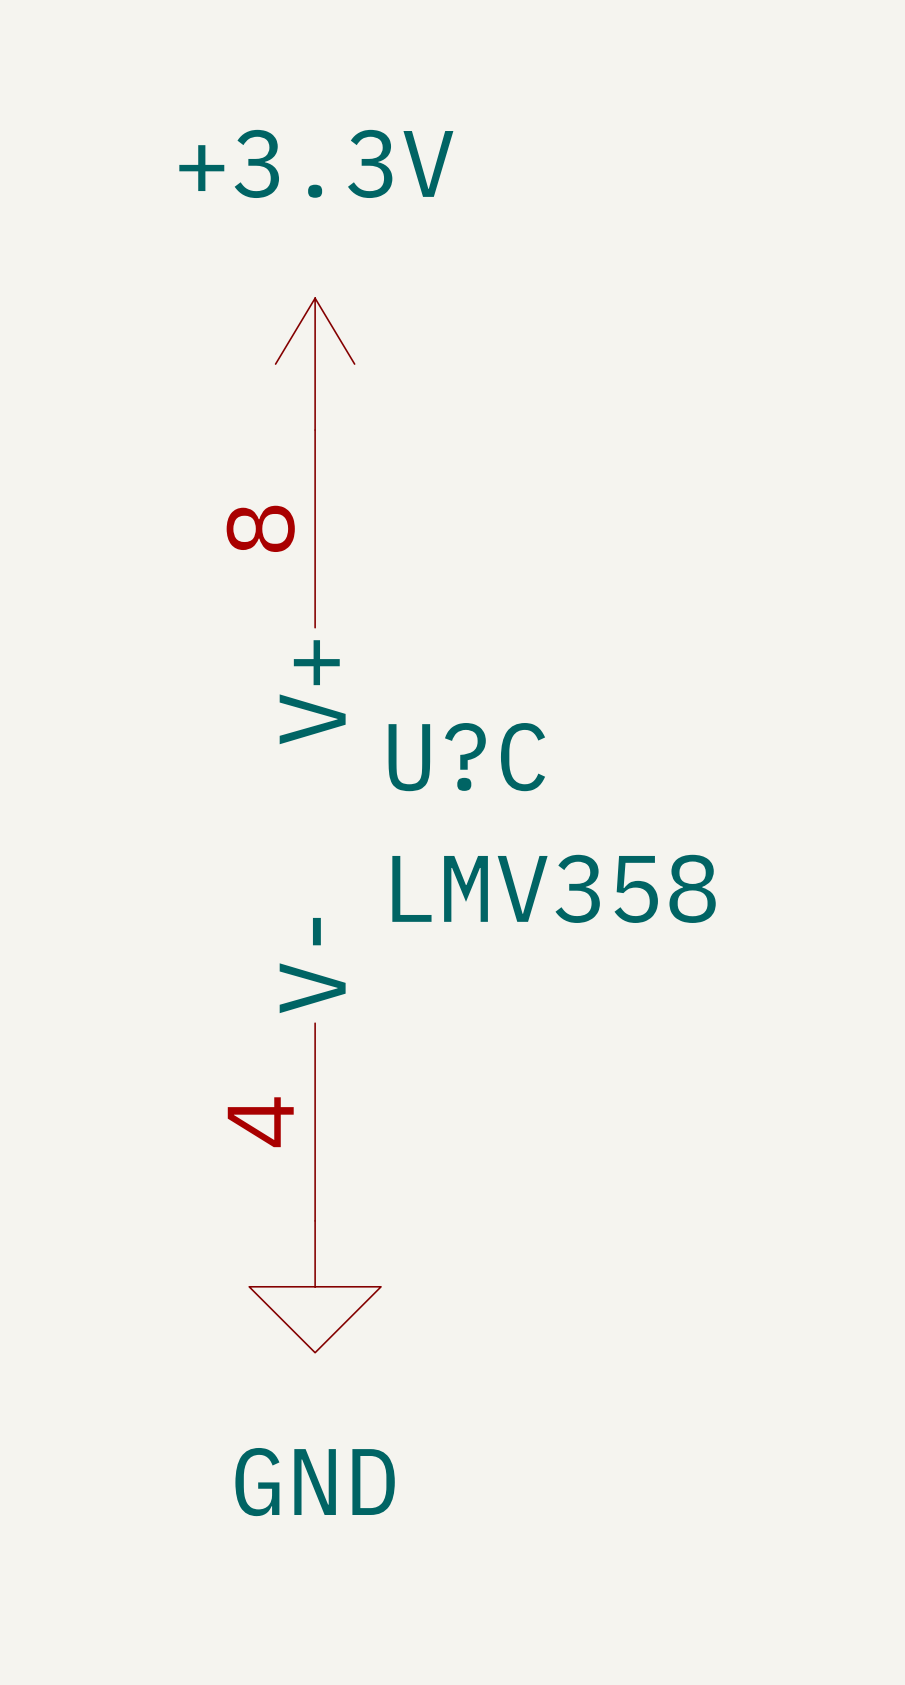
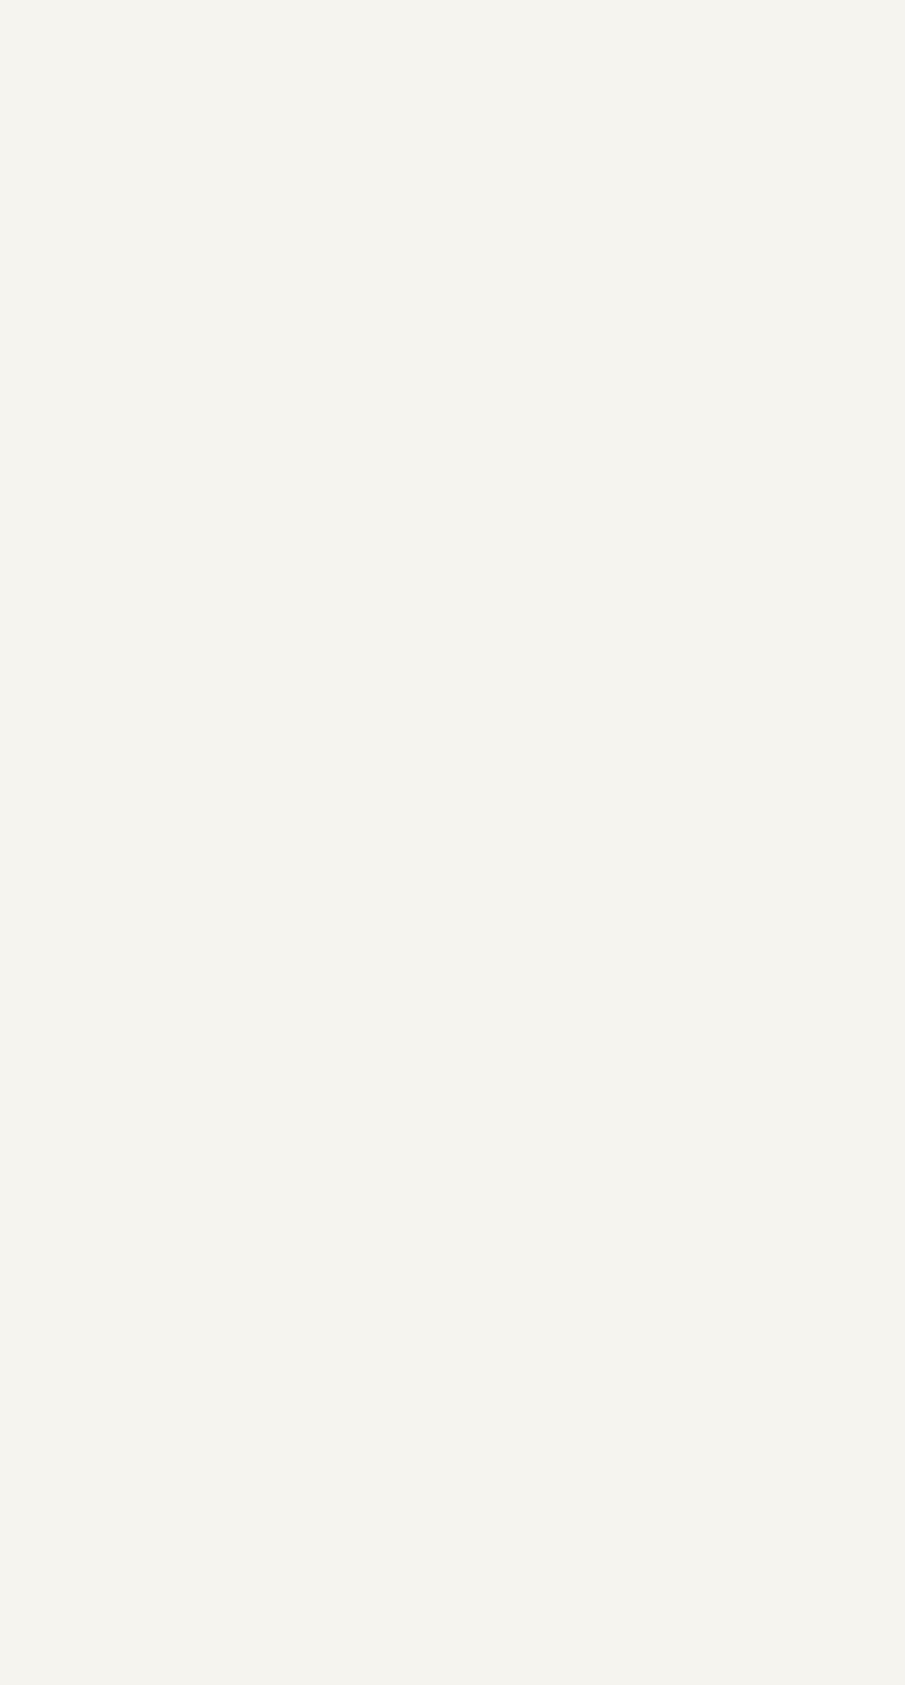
power symbol: +3.3V (315, 364) -> none
U?C: LMV358 (315, 825) -> none
power symbol: GND (315, 1286) -> none

